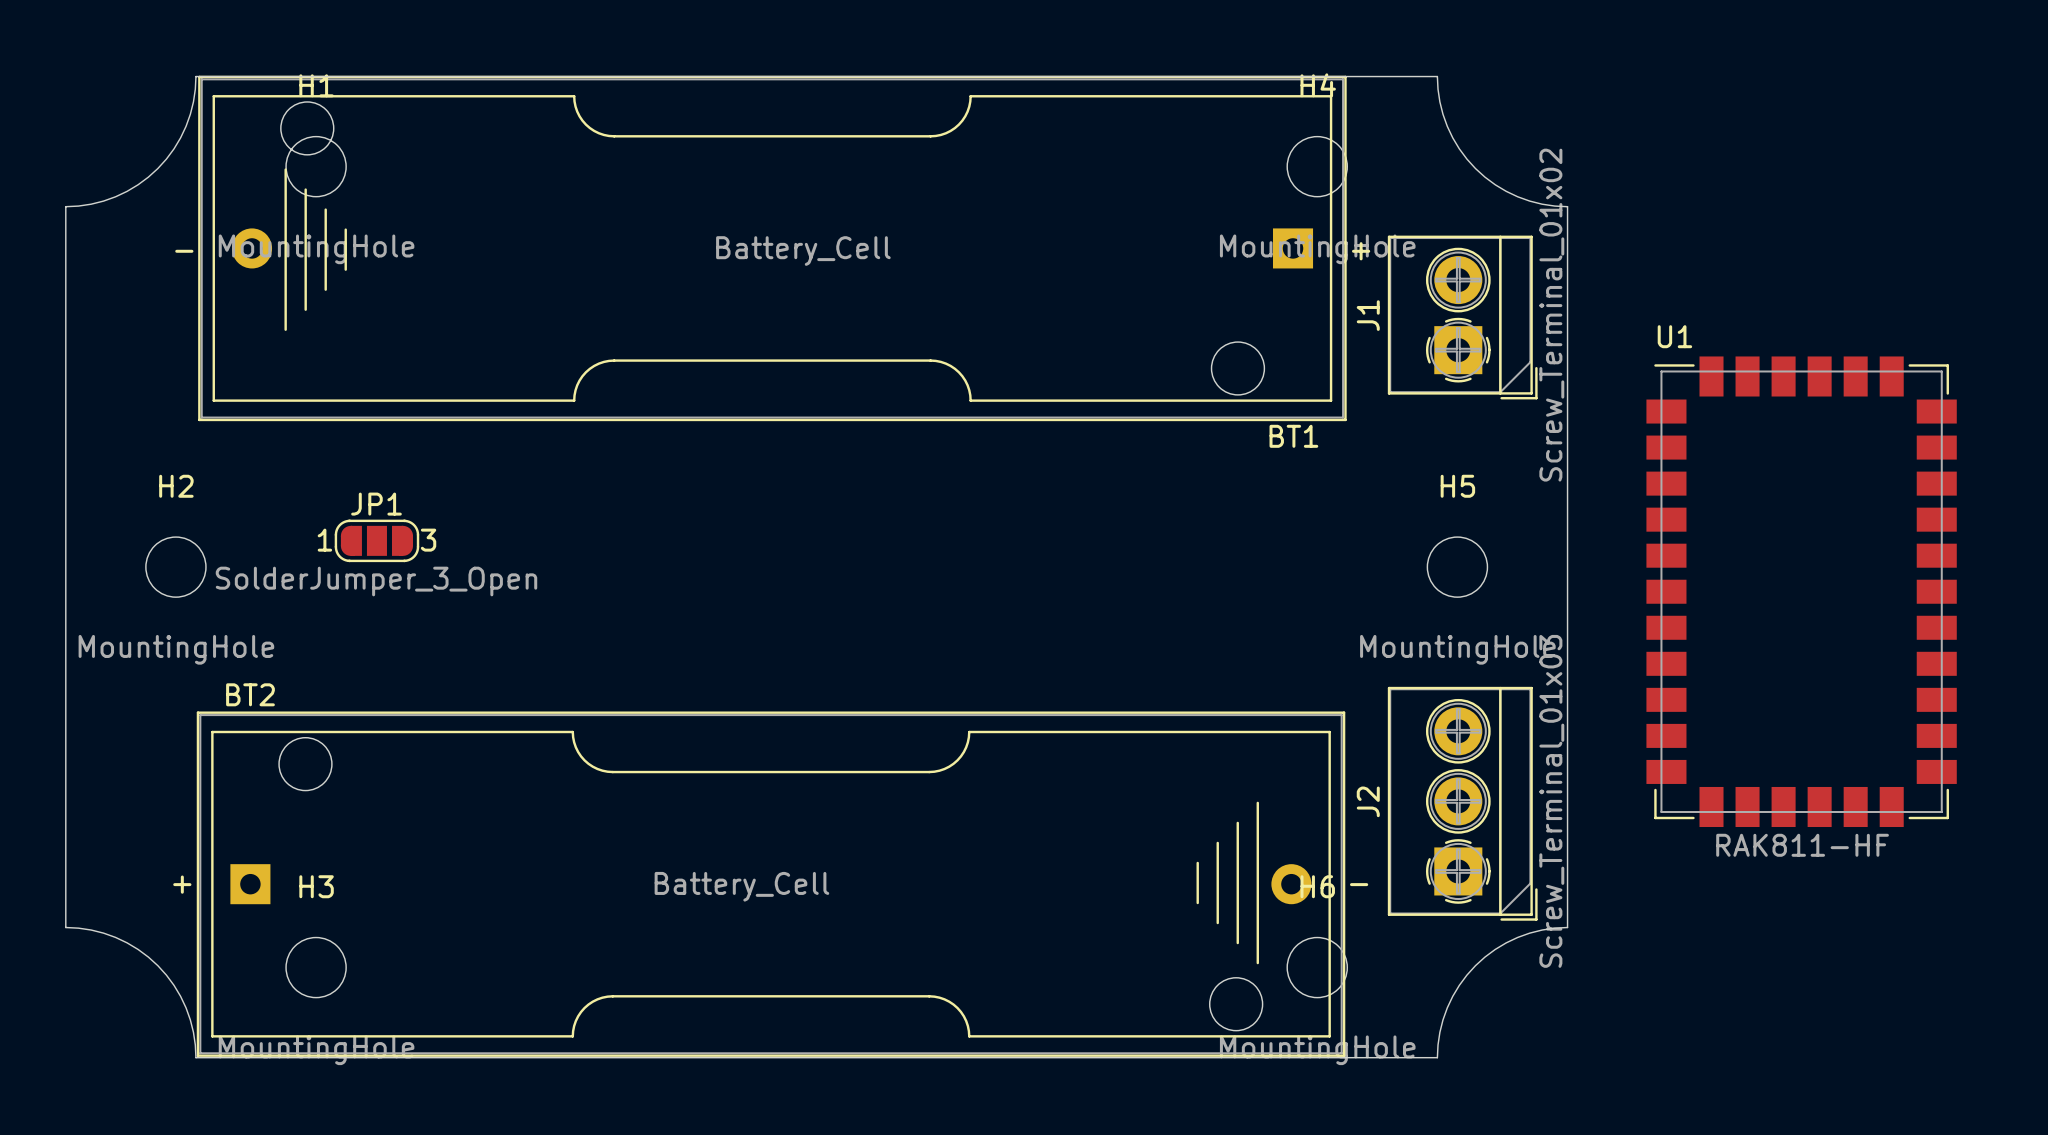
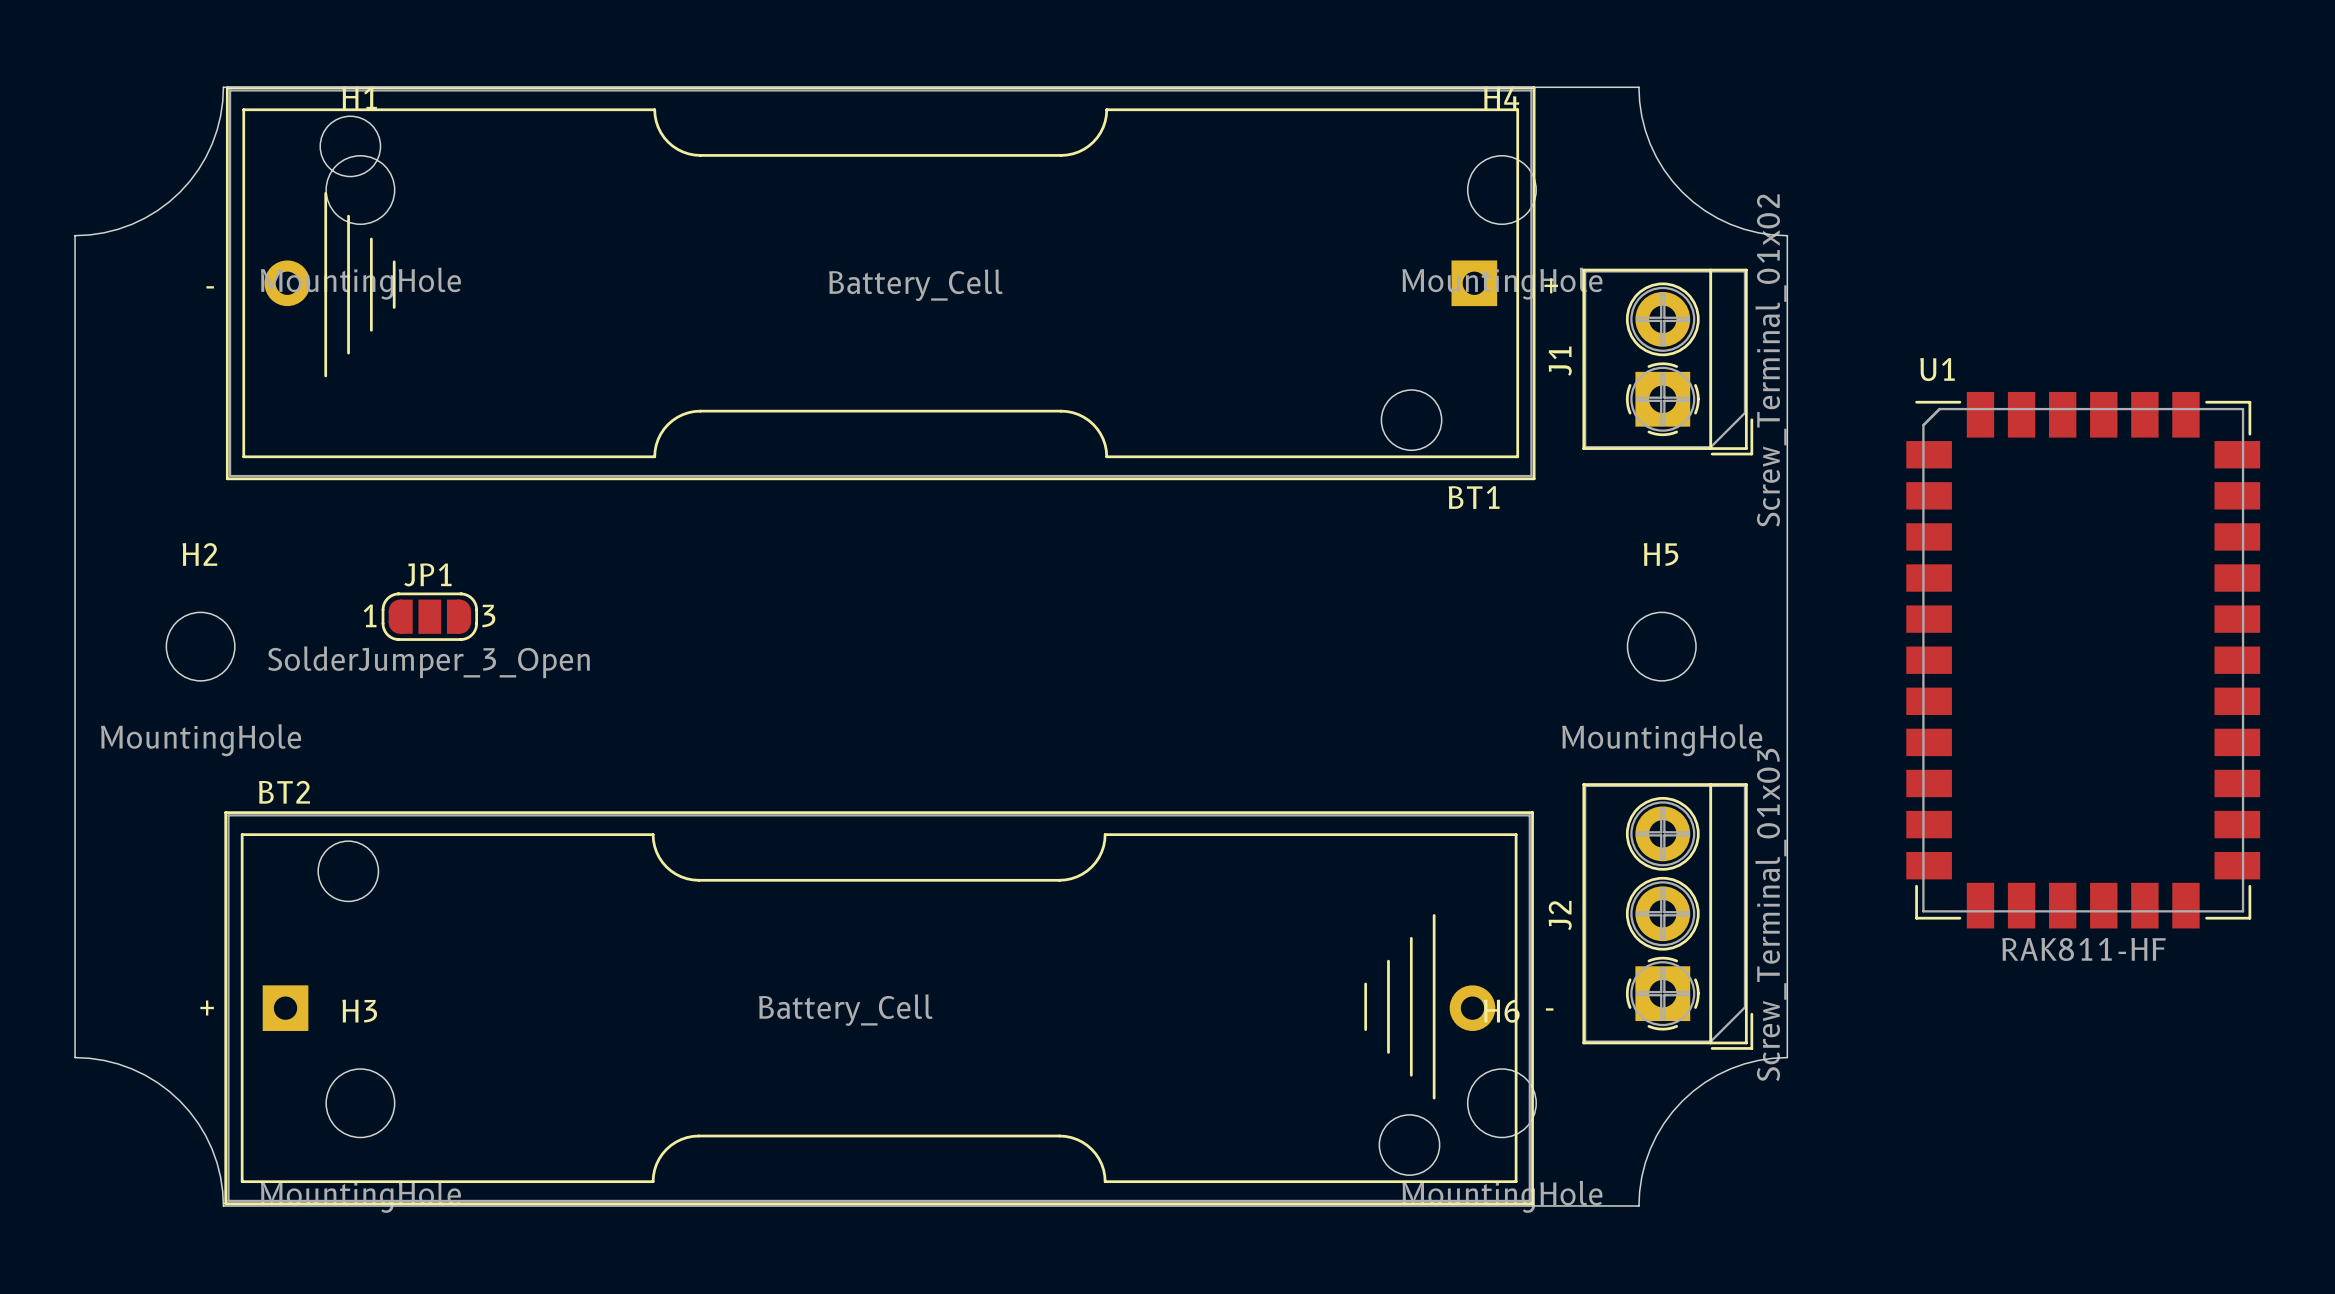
U1 footprint: [1646, 356, 1957, 828] -> [1906, 391, 2261, 929]

